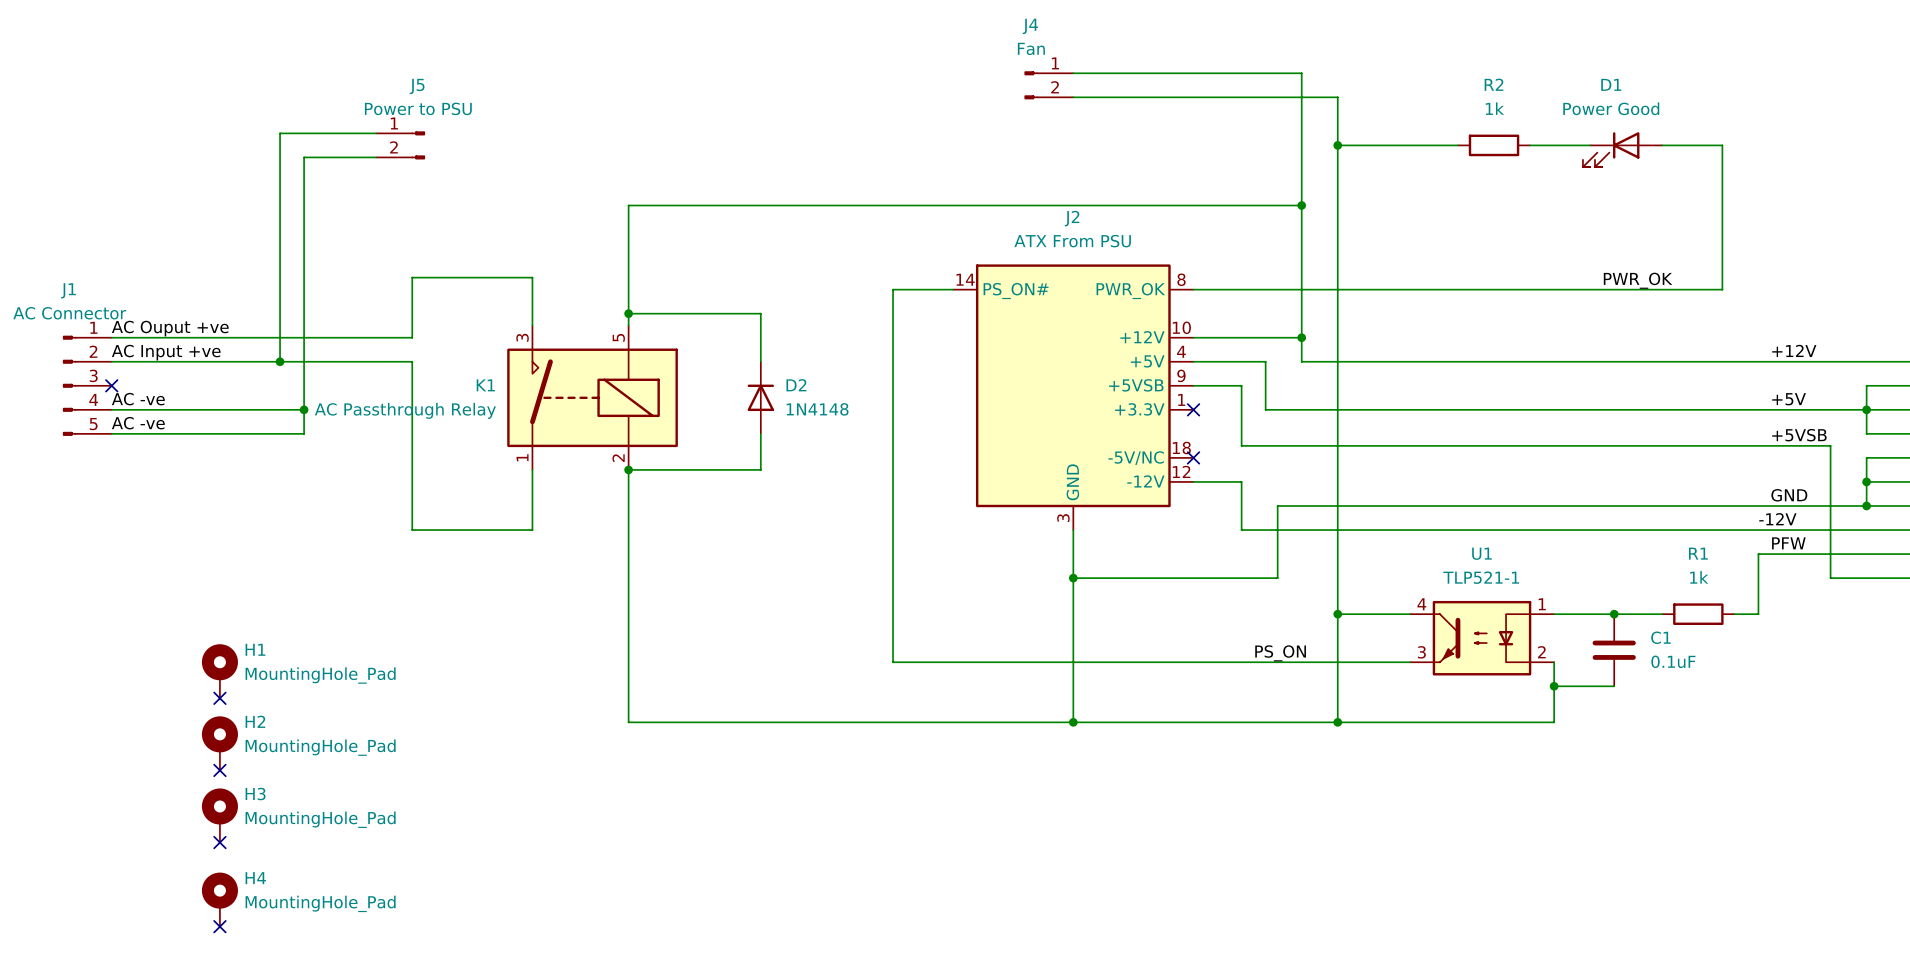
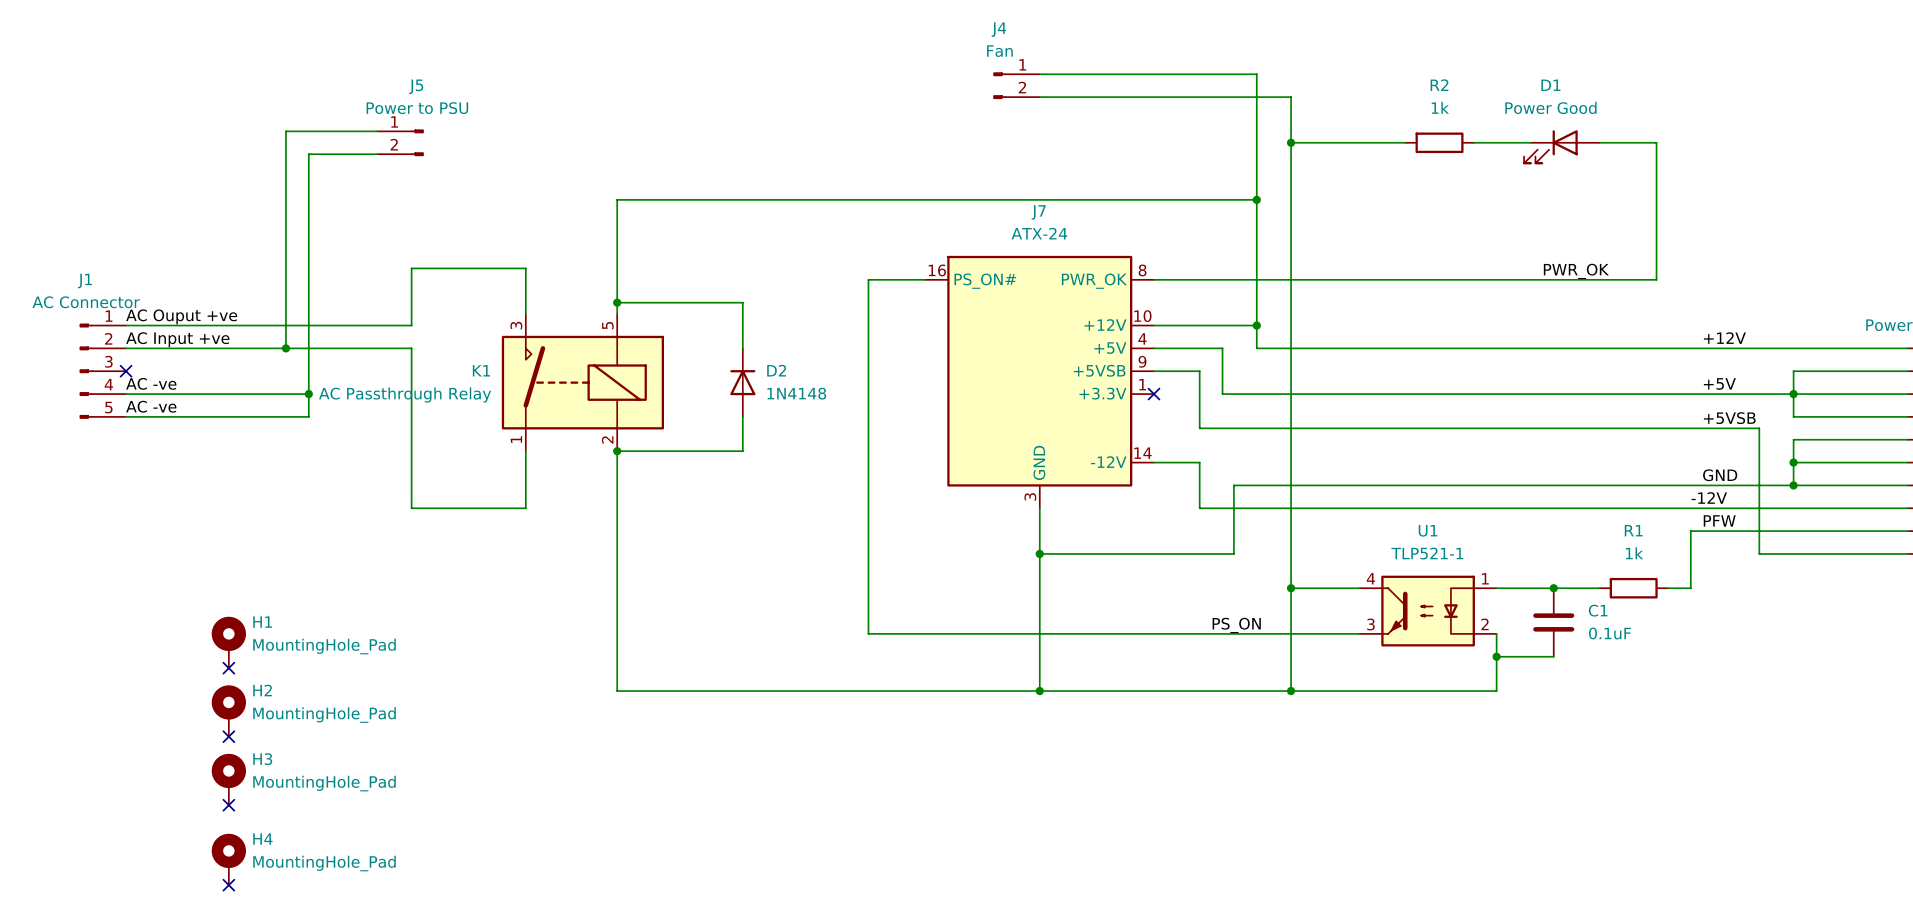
J2: ATX From PSU (1073, 397) -> none
J7: none -> ATX-24 (1039, 382)
no-connect mark: (1193, 457) -> none

